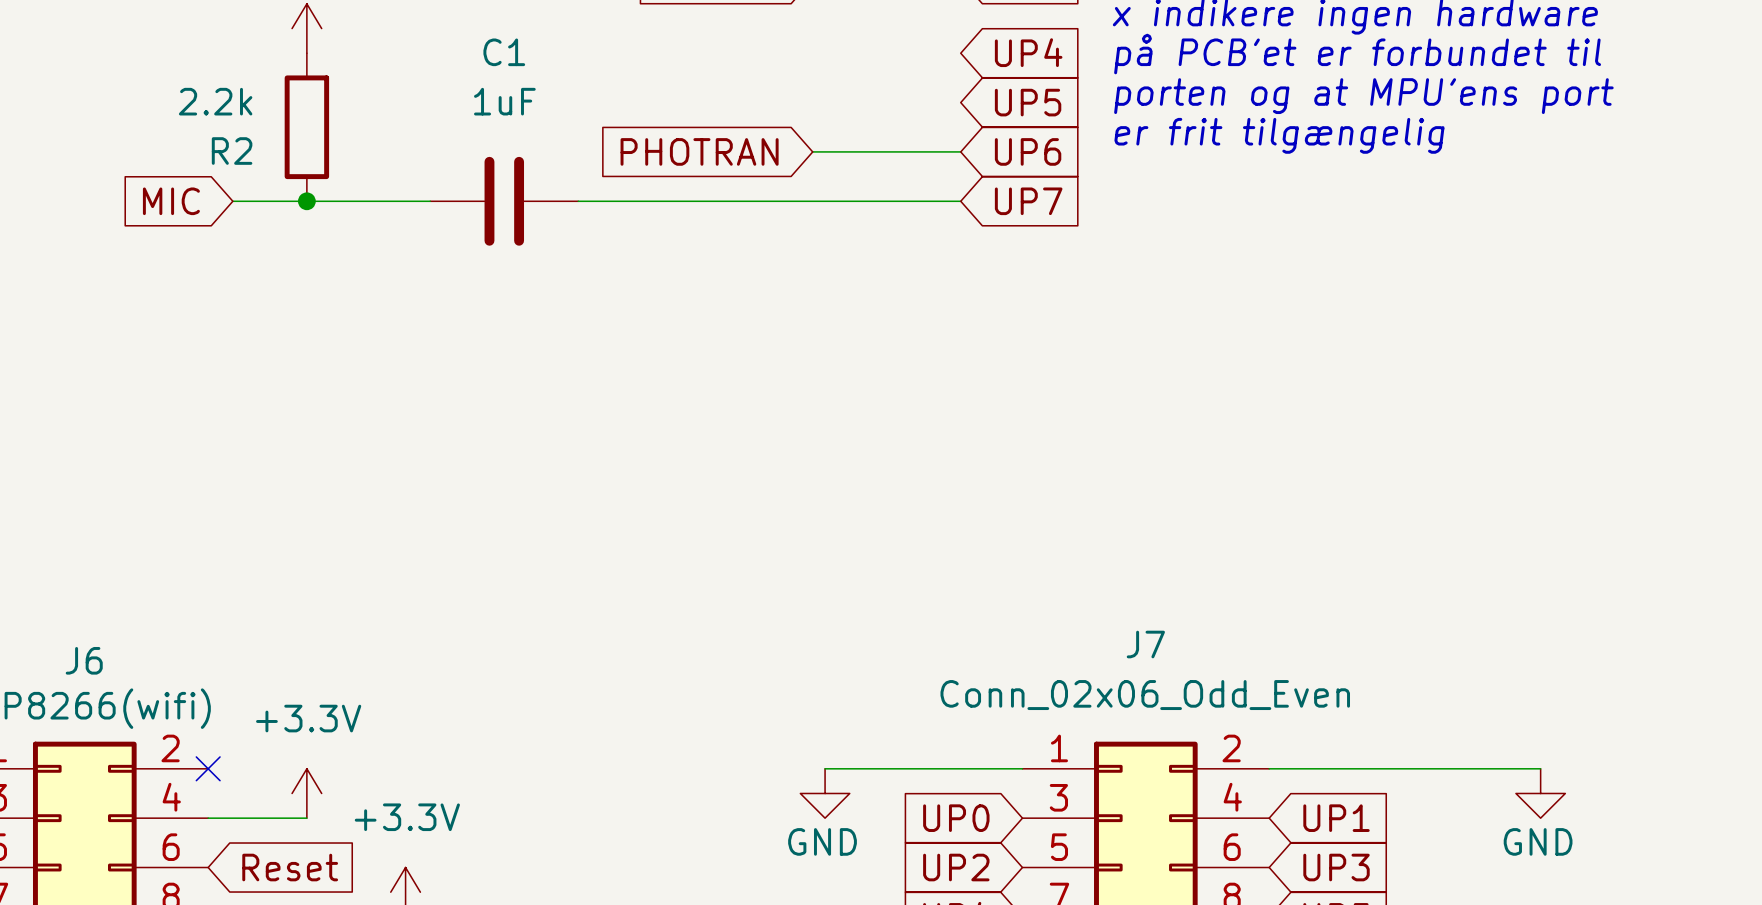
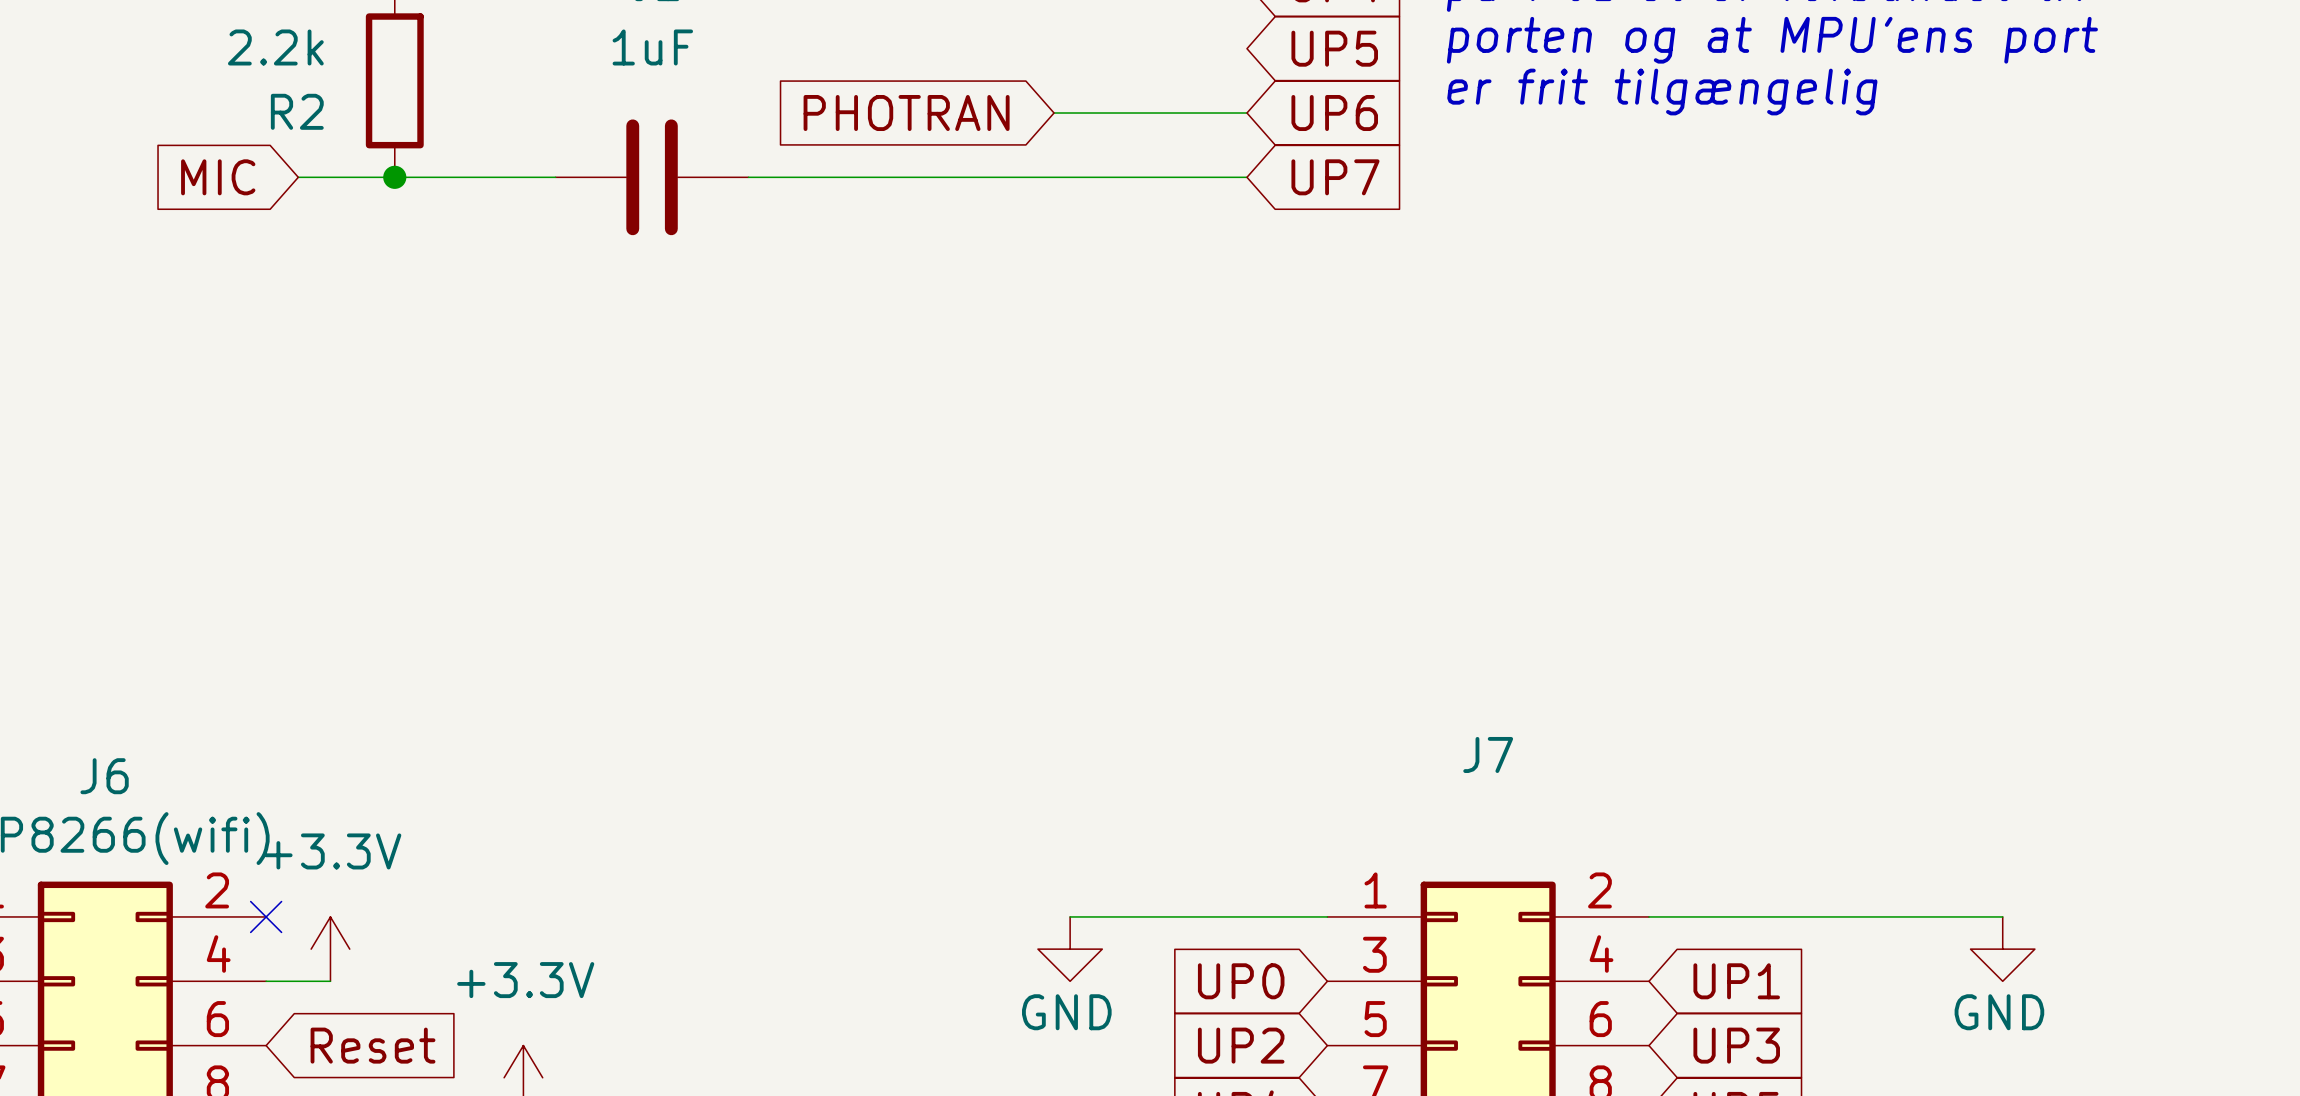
J7 value: Conn_02x06_Odd_Even (1145, 695) -> none
power symbol position: +3.3V (306, 793) -> +3.3V (330, 949)
wire: (257, 818) (306, 818) -> none

